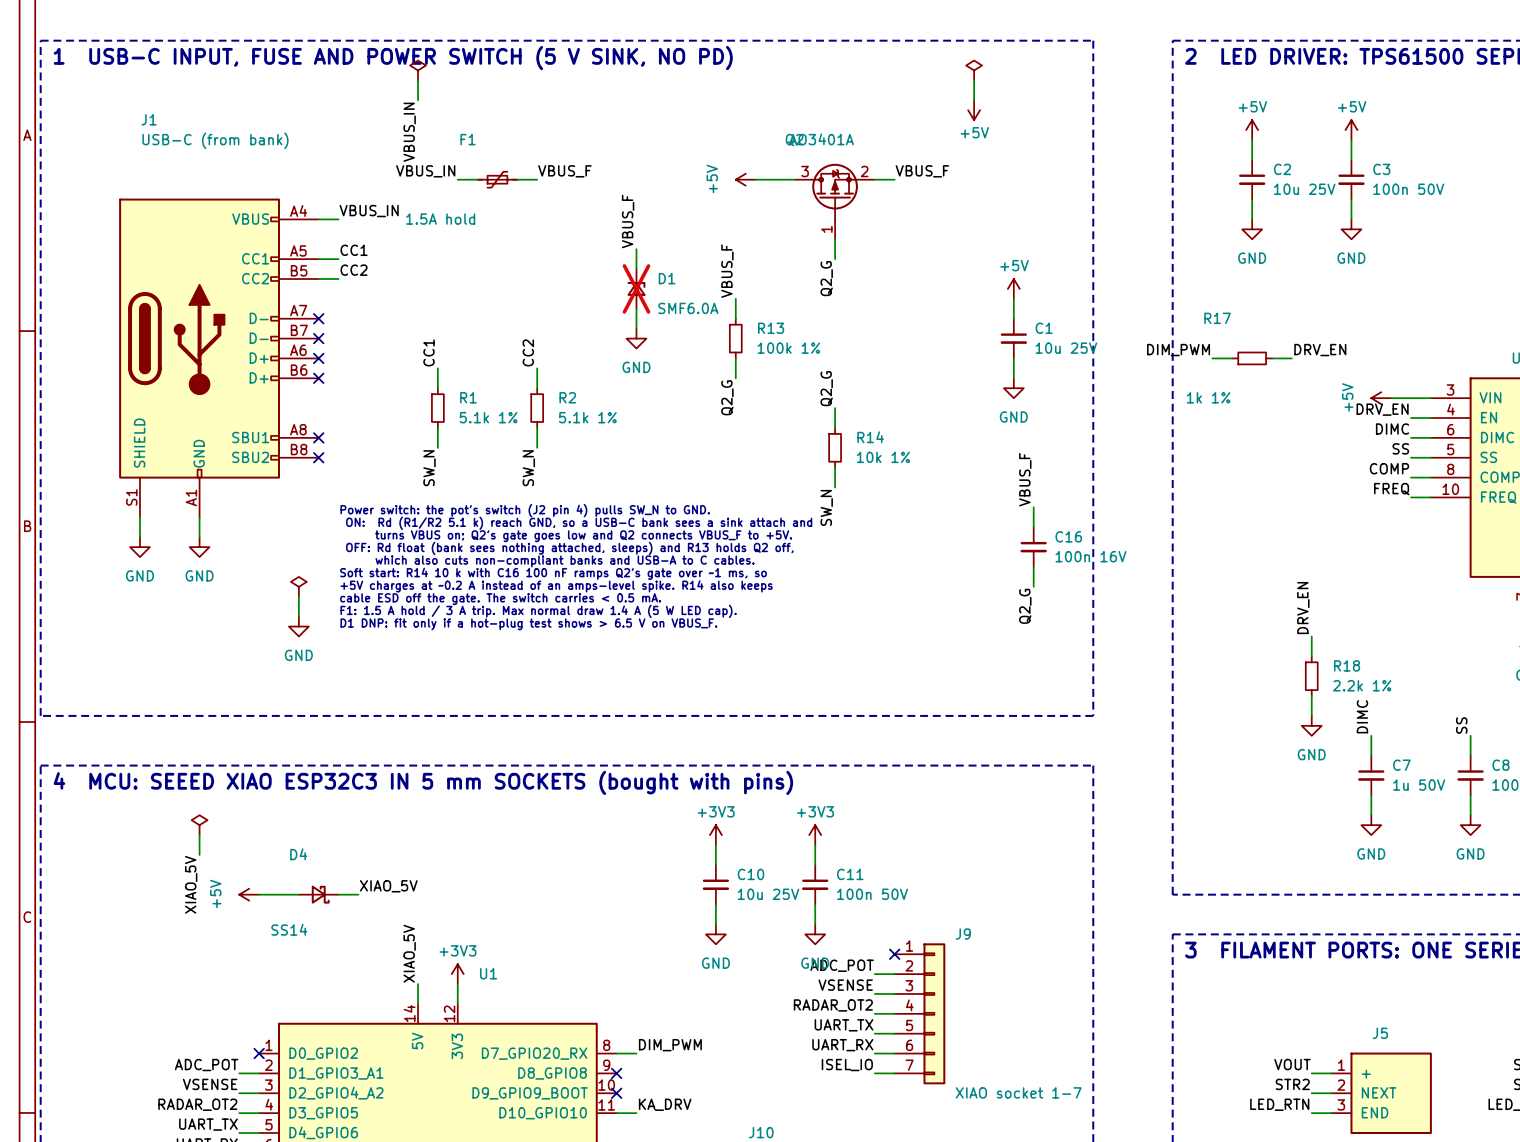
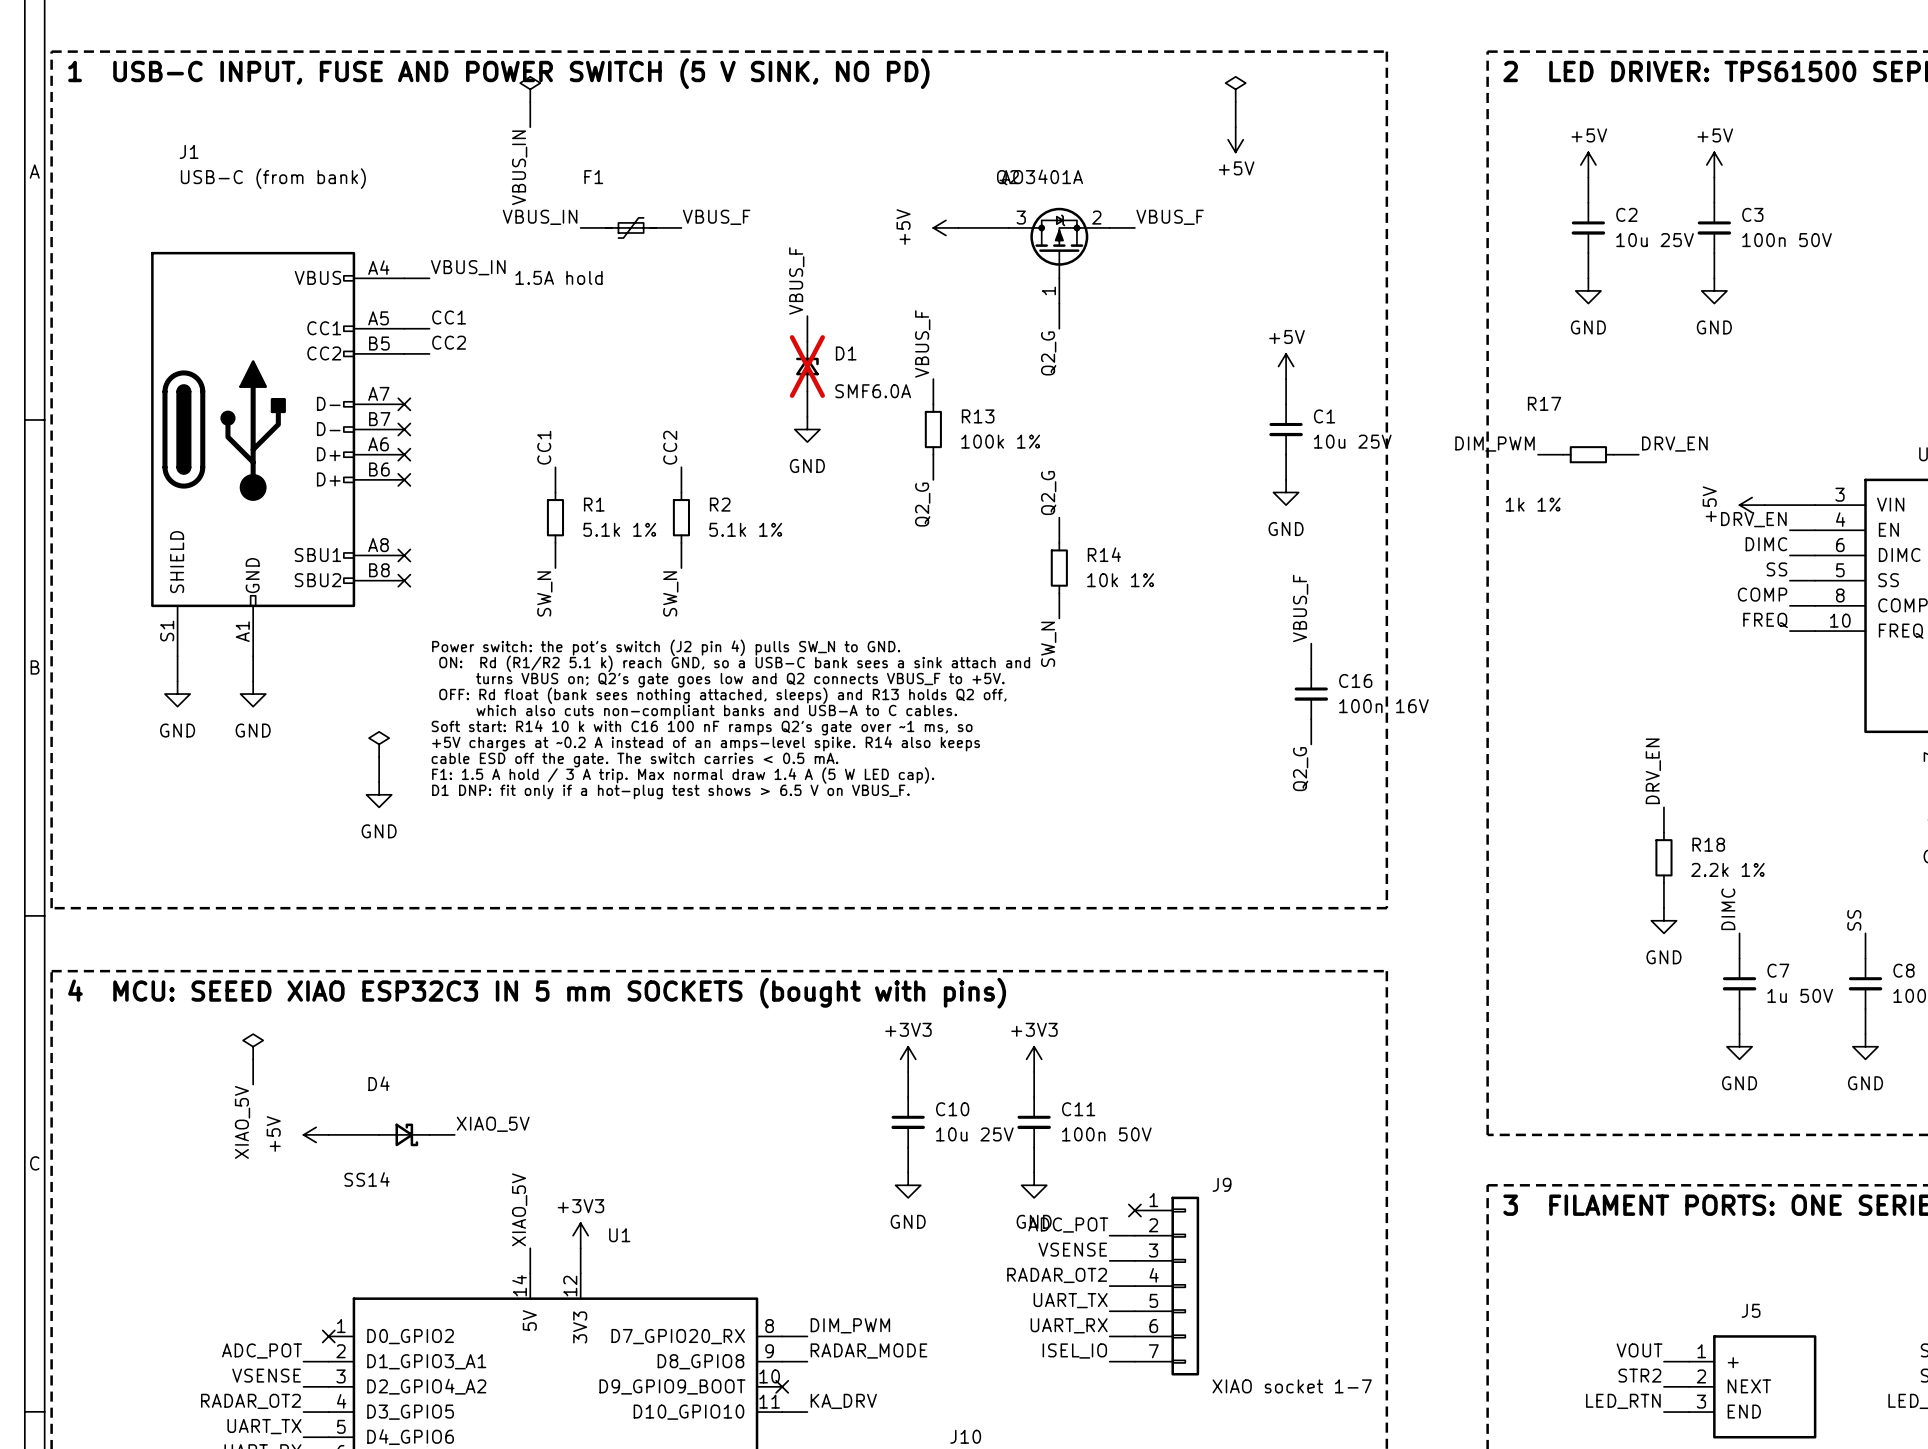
label: none -> RADAR_MODE (868, 1351)
wire: none -> (782, 1361) (807, 1361)
no-connect mark: (616, 1073) -> none

